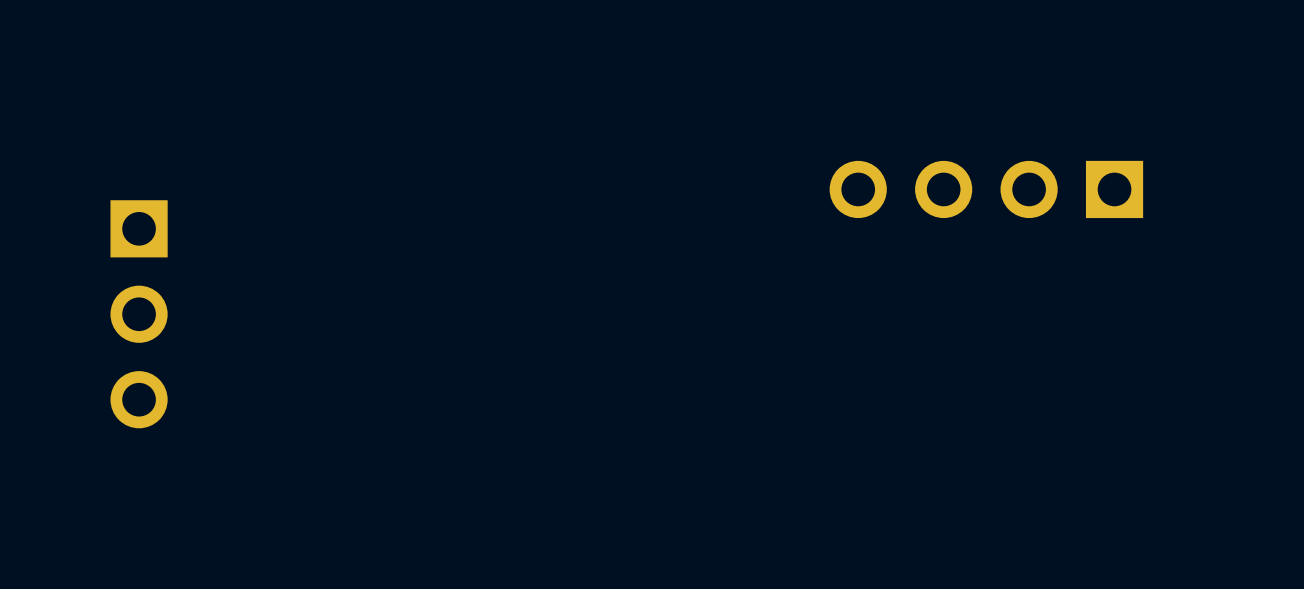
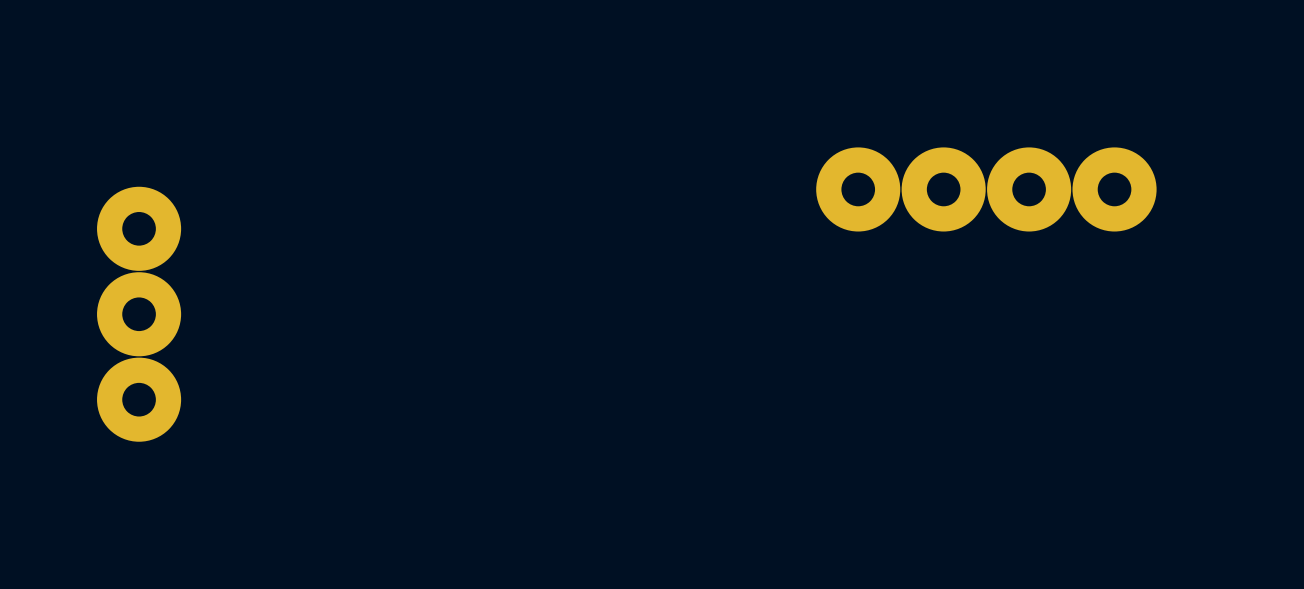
part footprint: [829, 160, 1144, 219] -> [816, 147, 1157, 232]
part footprint: [110, 200, 168, 429] -> [97, 186, 182, 442]

